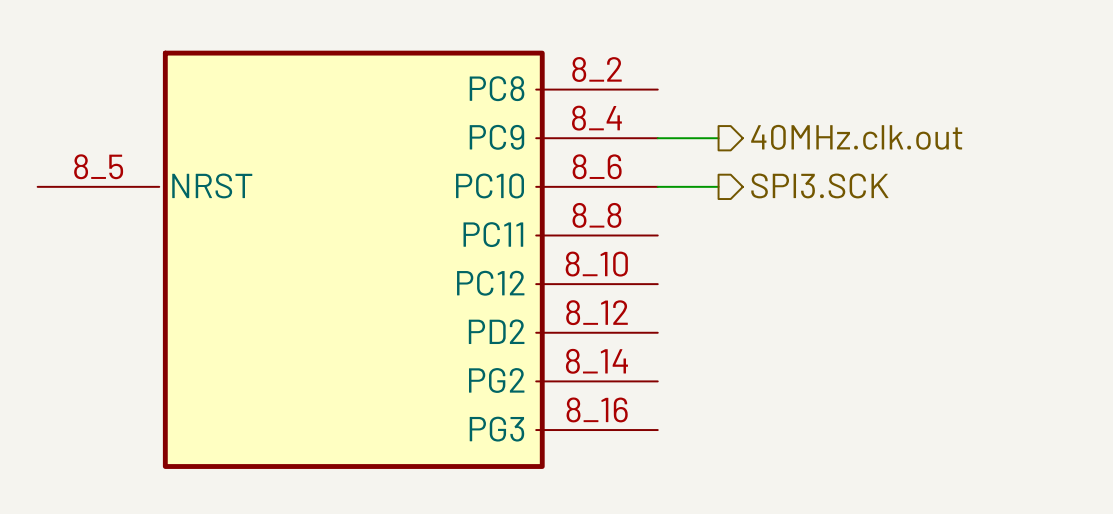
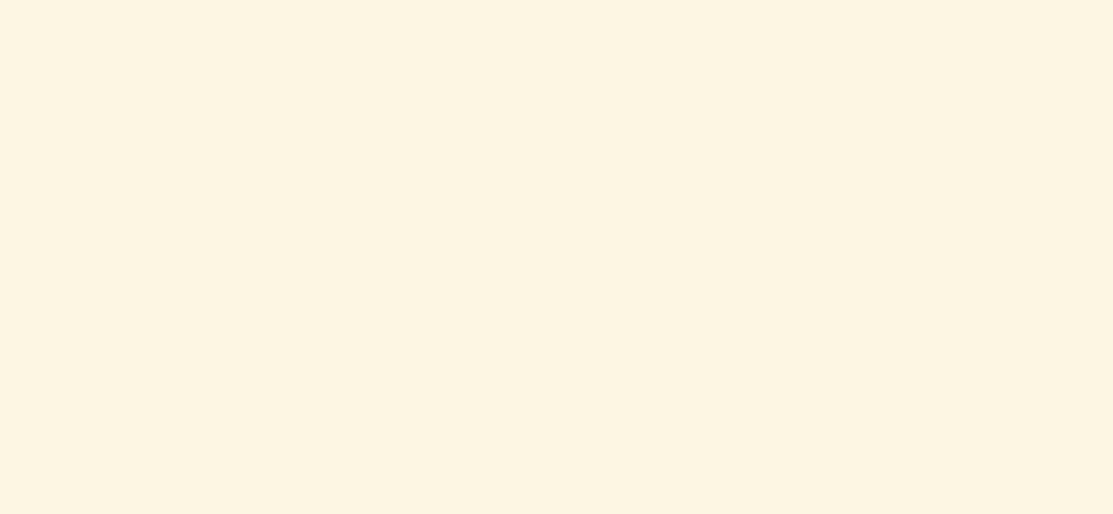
hierarchical label: 40MHz.clk.out (856, 137) -> none
wire: (657, 138) (718, 138) -> none
hierarchical label: SPI3.SCK (819, 185) -> none
wire: (657, 186) (718, 186) -> none
part: (347, 259) -> none

